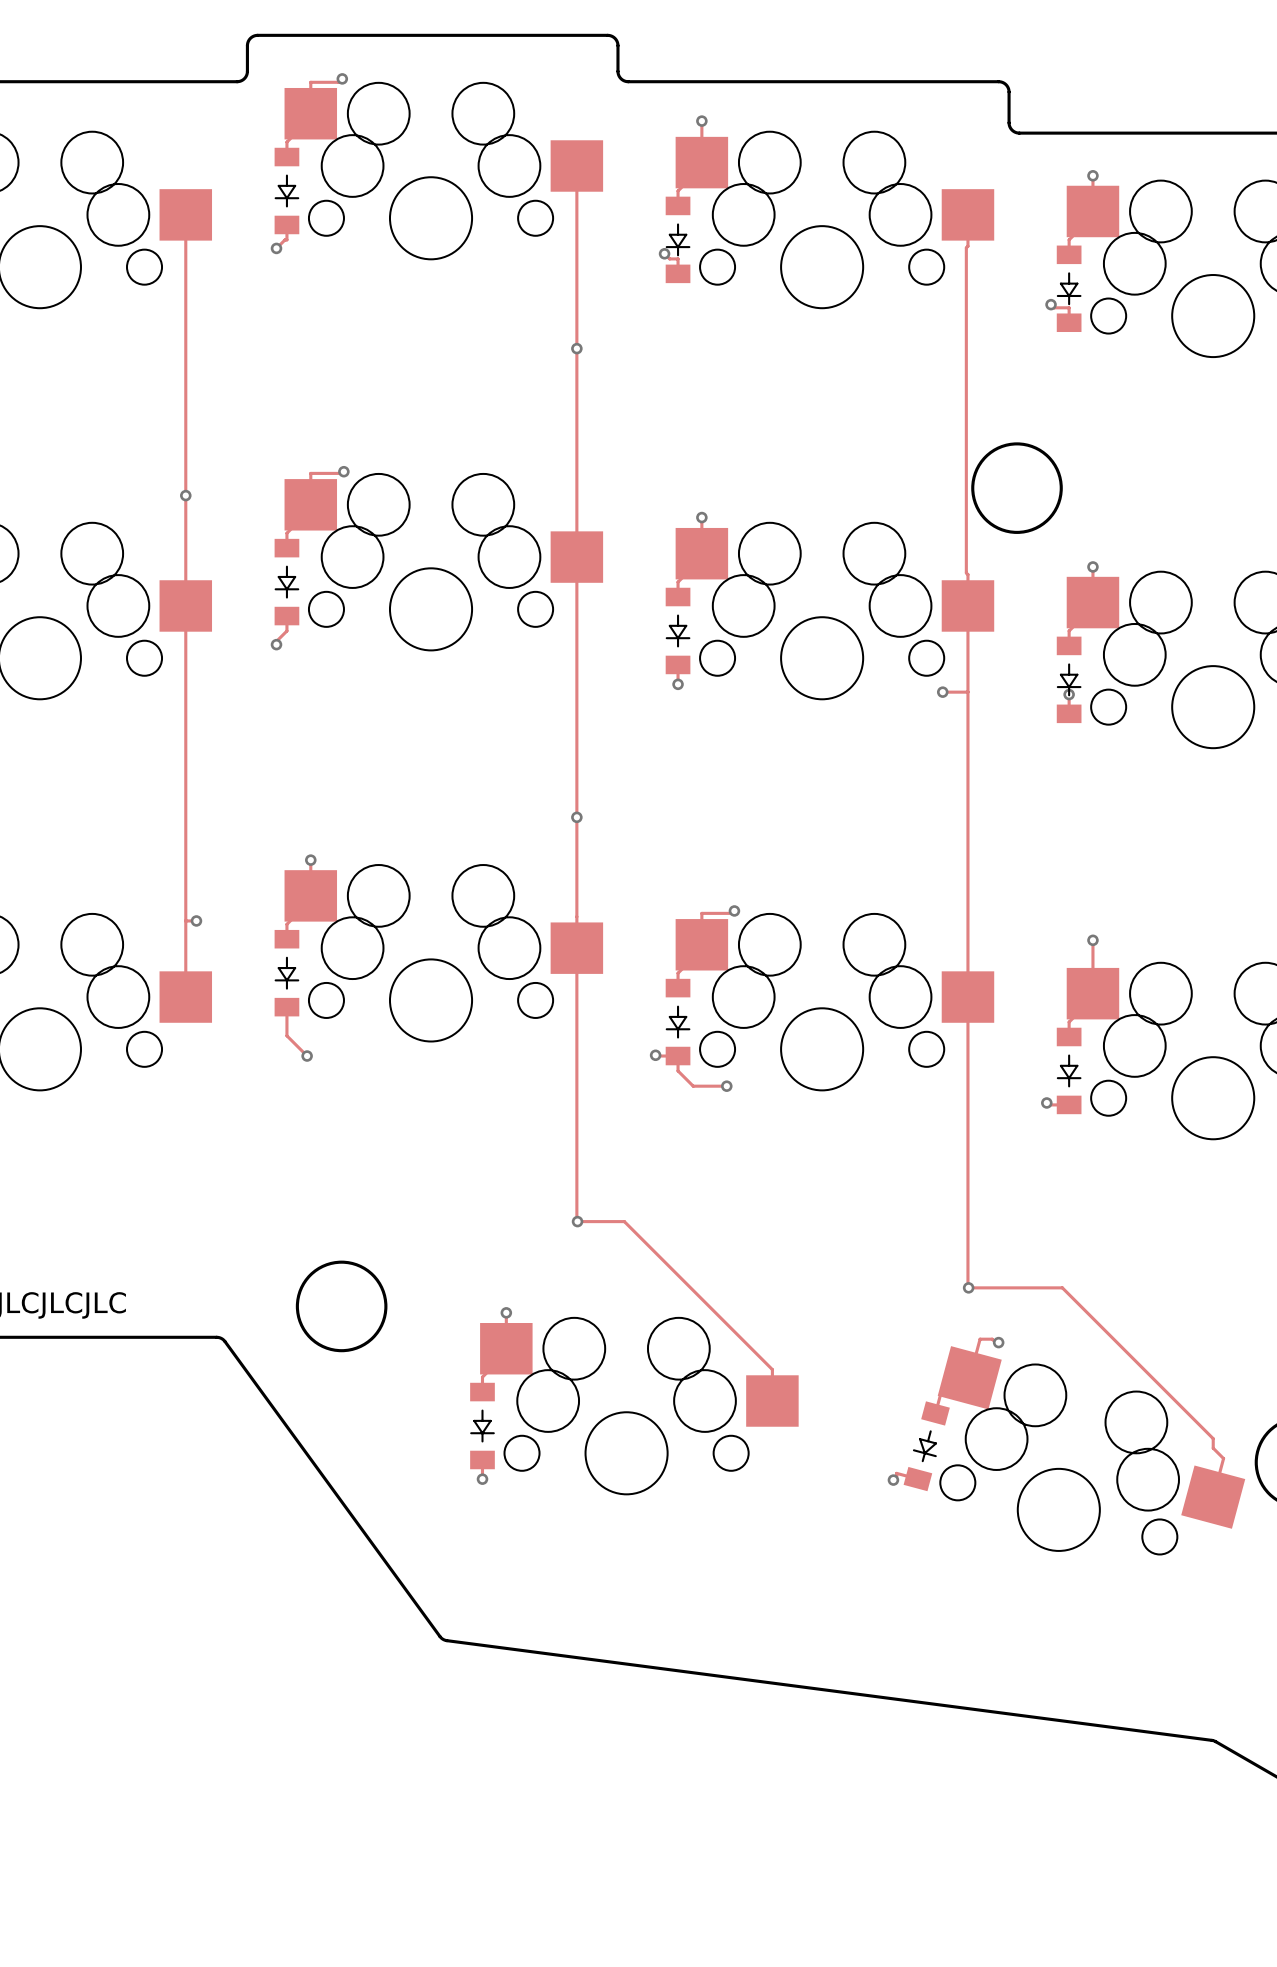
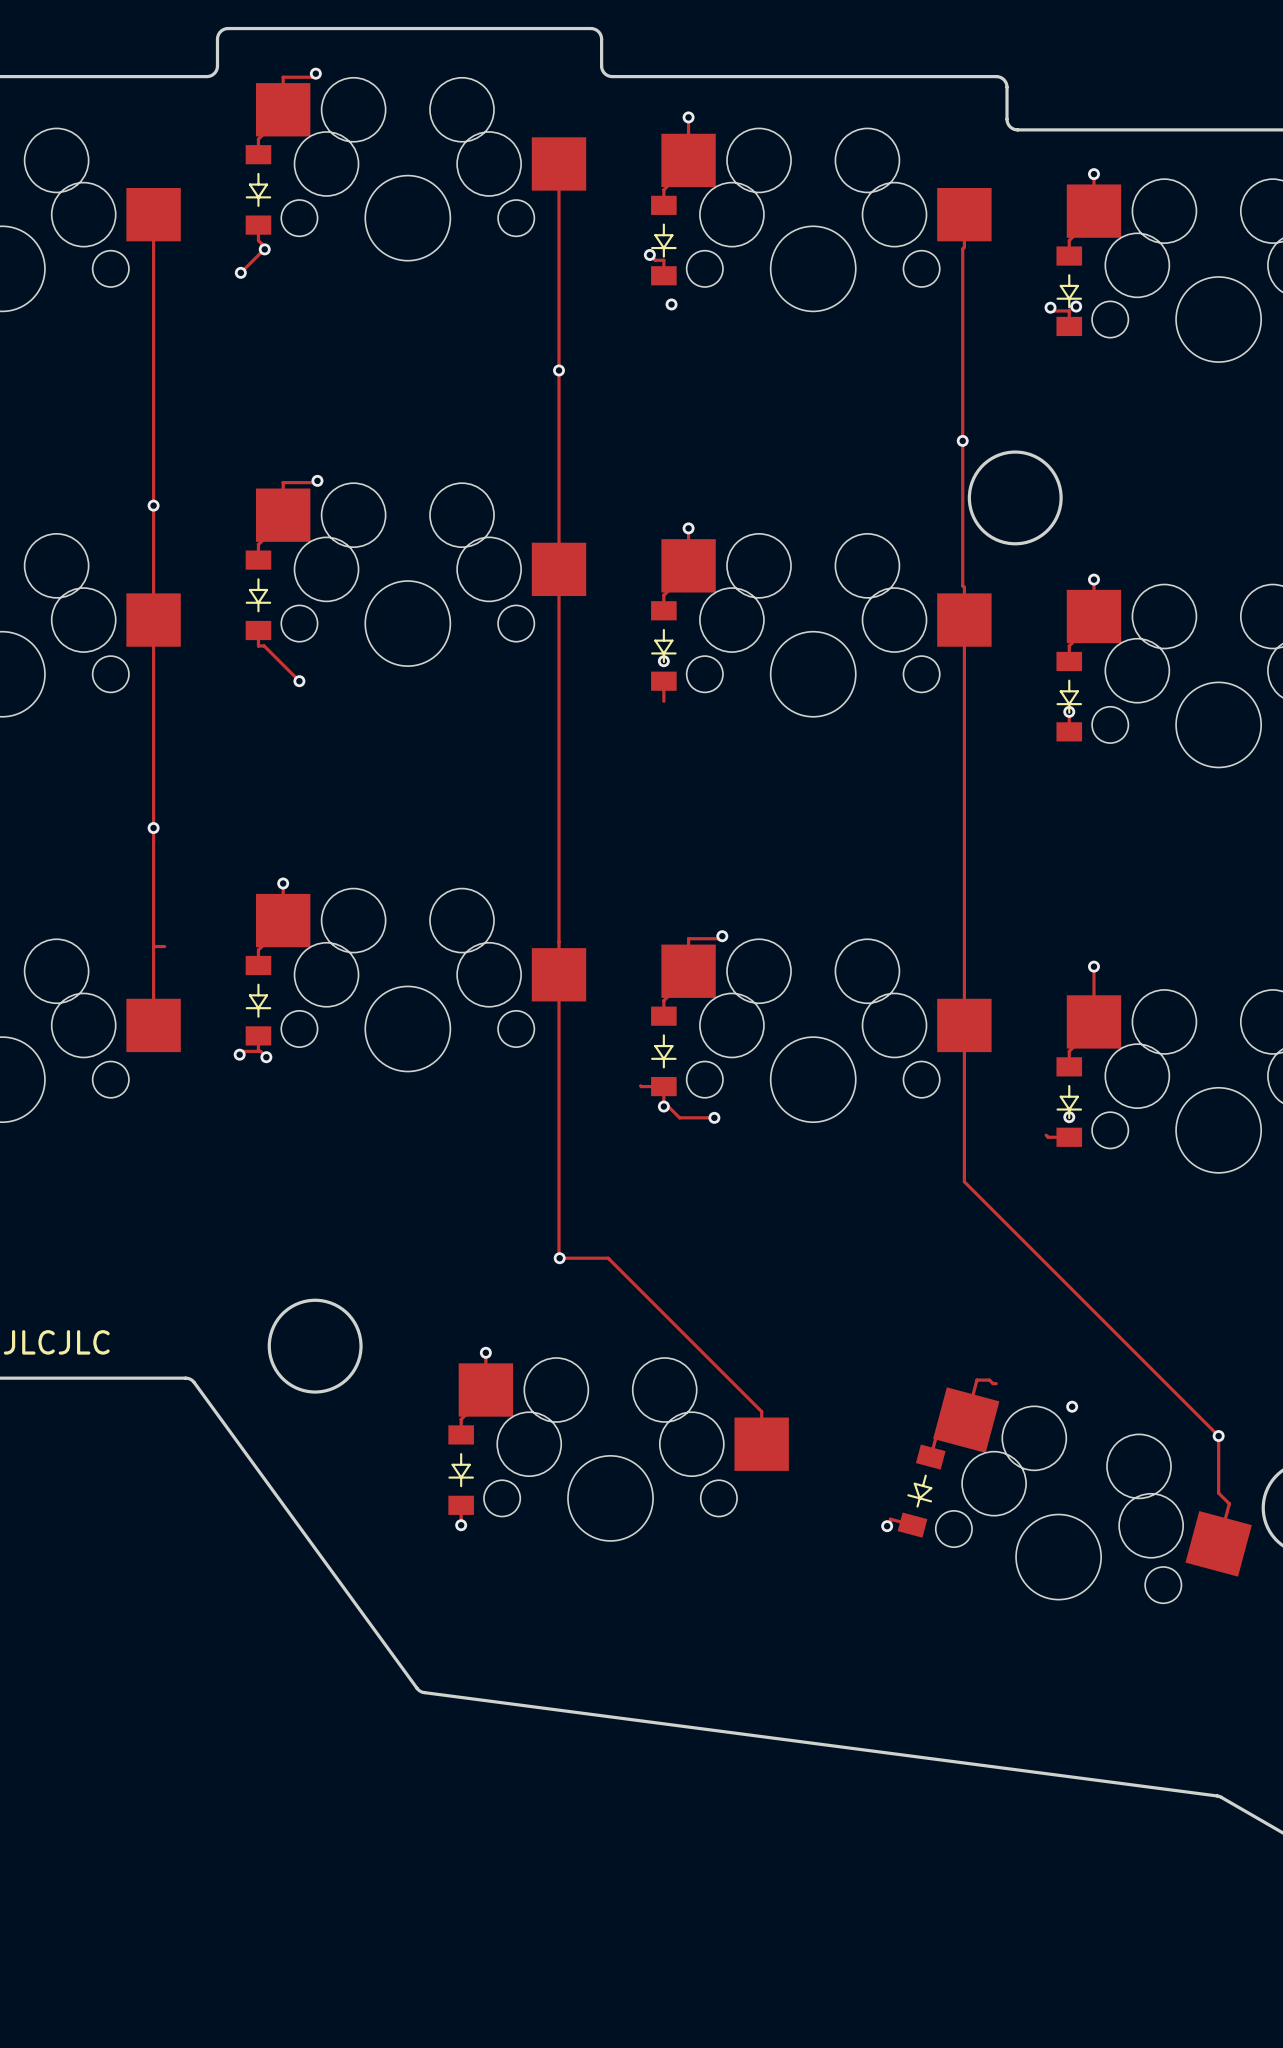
track: (286, 239) (276, 248) -> (258, 240) (261, 243) (261, 251) (240, 272)
via: (276, 248) -> none
via: none -> (264, 249)
via: none -> (240, 272)
via: none -> (671, 304)
via: none -> (1076, 306)
via position: (576, 348) -> (558, 370)
via: none -> (962, 440)
track: (286, 630) (276, 641) (276, 644) -> (258, 645) (264, 645) (299, 681)
via position: (276, 644) -> (299, 681)
via position: (678, 684) -> (663, 661)
track: (942, 692) (967, 692) -> none
via: (942, 692) -> none
via: none -> (153, 828)
via: (576, 817) -> none
via: (196, 920) -> none
track: (286, 1022) (286, 1035) (307, 1056) -> none
track: none -> (239, 1054) (242, 1051) (260, 1051) (266, 1057)
via: none -> (239, 1054)
via: none -> (266, 1057)
via position: (655, 1055) -> (663, 1106)
via: (307, 1056) -> none
via position: (1046, 1102) -> (1069, 1117)
track: (967, 1147) (967, 1287) (1062, 1287) (1213, 1438) -> (964, 1181) (1218, 1436) (1218, 1483)
via: (968, 1287) -> none
via: (998, 1342) -> none
via: none -> (1072, 1406)
via: none -> (1218, 1436)

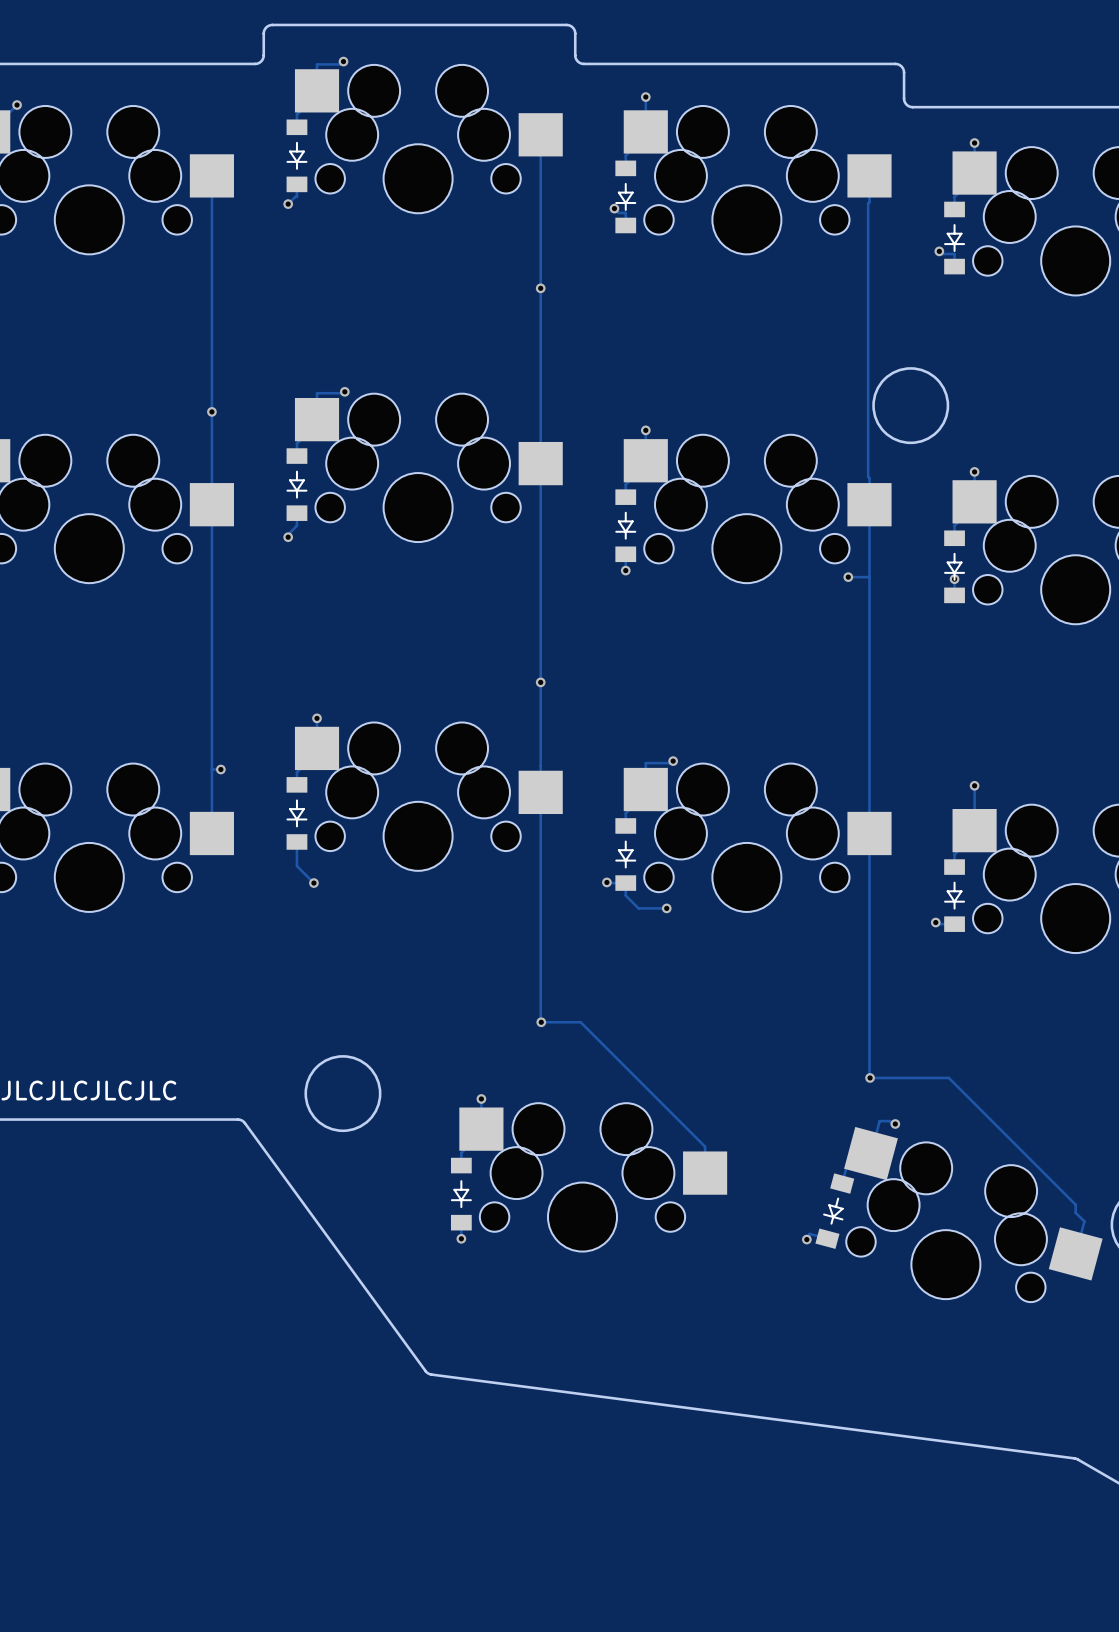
track: (258, 240) (261, 243) (261, 251) (240, 272) -> (296, 196) (288, 204)
via: none -> (288, 204)
via: (264, 249) -> none
via: (240, 272) -> none
via: (671, 304) -> none
via: (1076, 306) -> none
via position: (558, 370) -> (540, 288)
via: (962, 440) -> none
track: (258, 645) (264, 645) (299, 681) -> (296, 525) (288, 534) (288, 537)
via position: (663, 661) -> (625, 570)
via position: (299, 681) -> (288, 537)
track: none -> (848, 577) (869, 577)
via: none -> (848, 577)
via: (153, 828) -> none
via: none -> (540, 682)
via: none -> (220, 769)
track: none -> (296, 854) (296, 866) (313, 883)
track: (239, 1054) (242, 1051) (260, 1051) (266, 1057) -> none
via: (239, 1054) -> none
via: (266, 1057) -> none
via: none -> (313, 883)
via position: (663, 1106) -> (606, 882)
via position: (1069, 1117) -> (935, 922)
track: (964, 1181) (1218, 1436) (1218, 1483) -> (869, 960) (869, 1077) (948, 1077) (1075, 1204)
via: none -> (870, 1077)
via: none -> (895, 1123)
via: (1072, 1406) -> none
via: (1218, 1436) -> none

